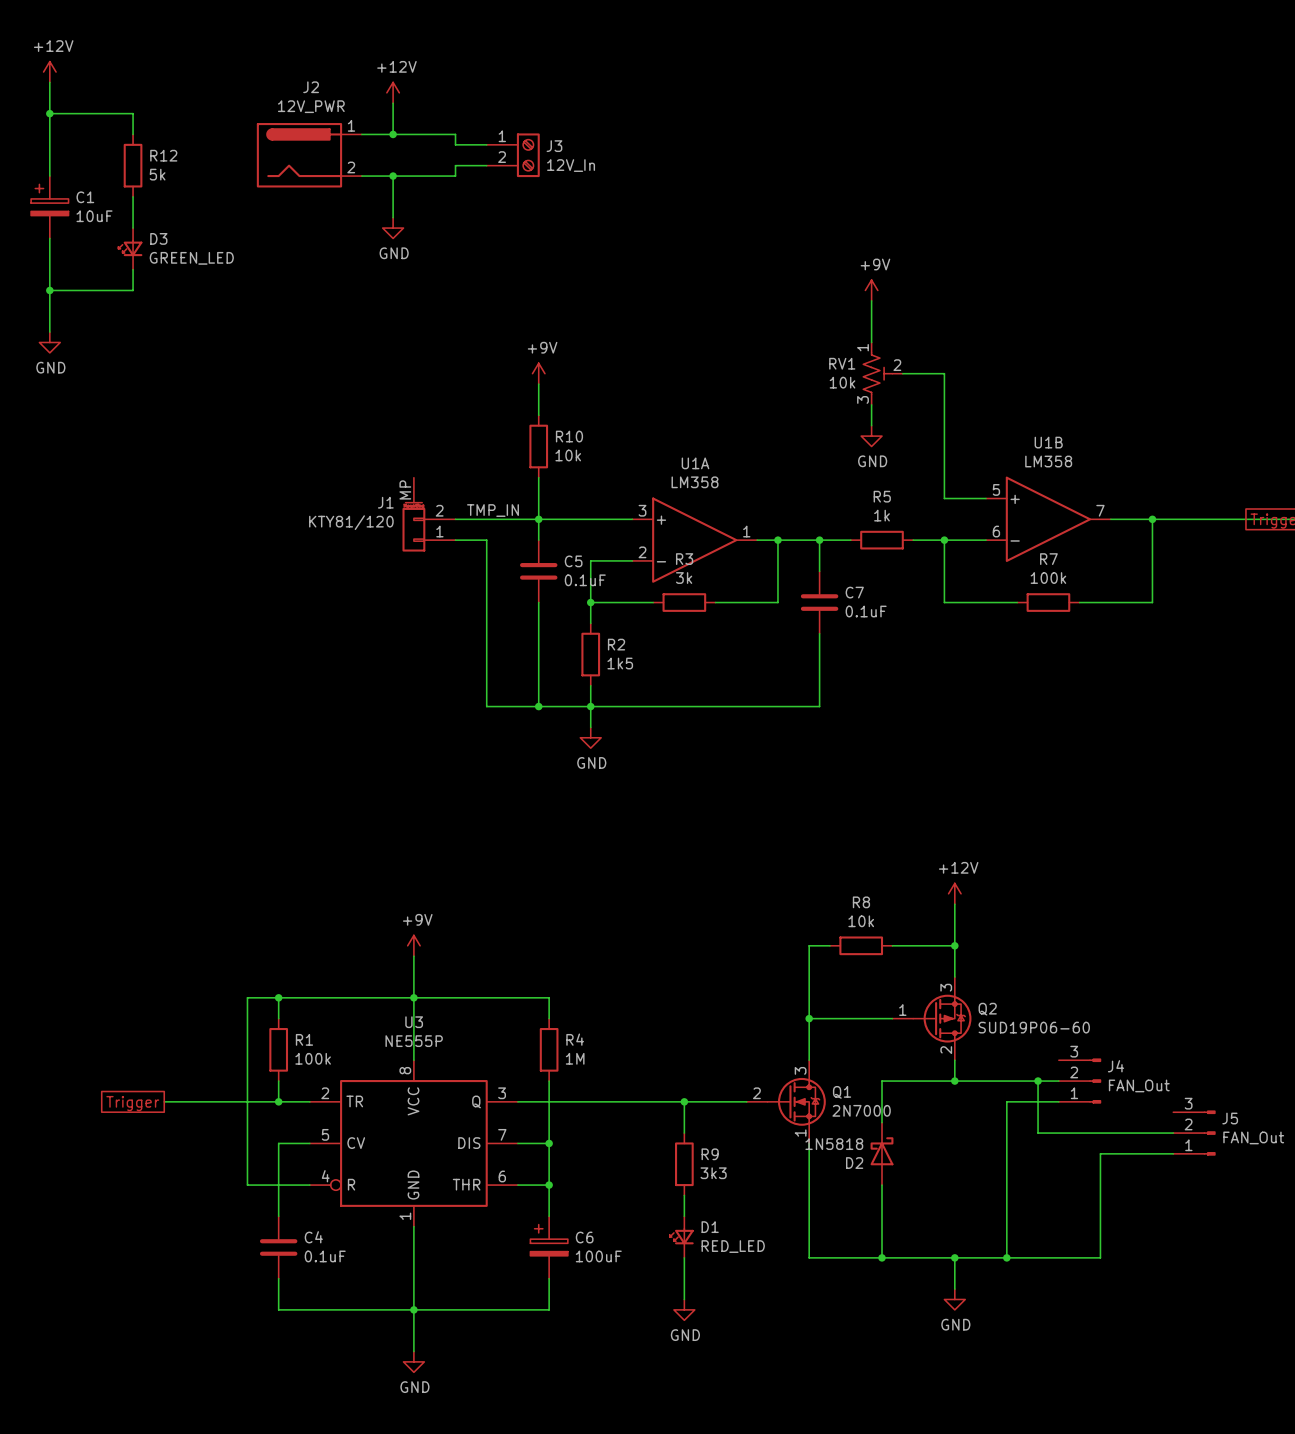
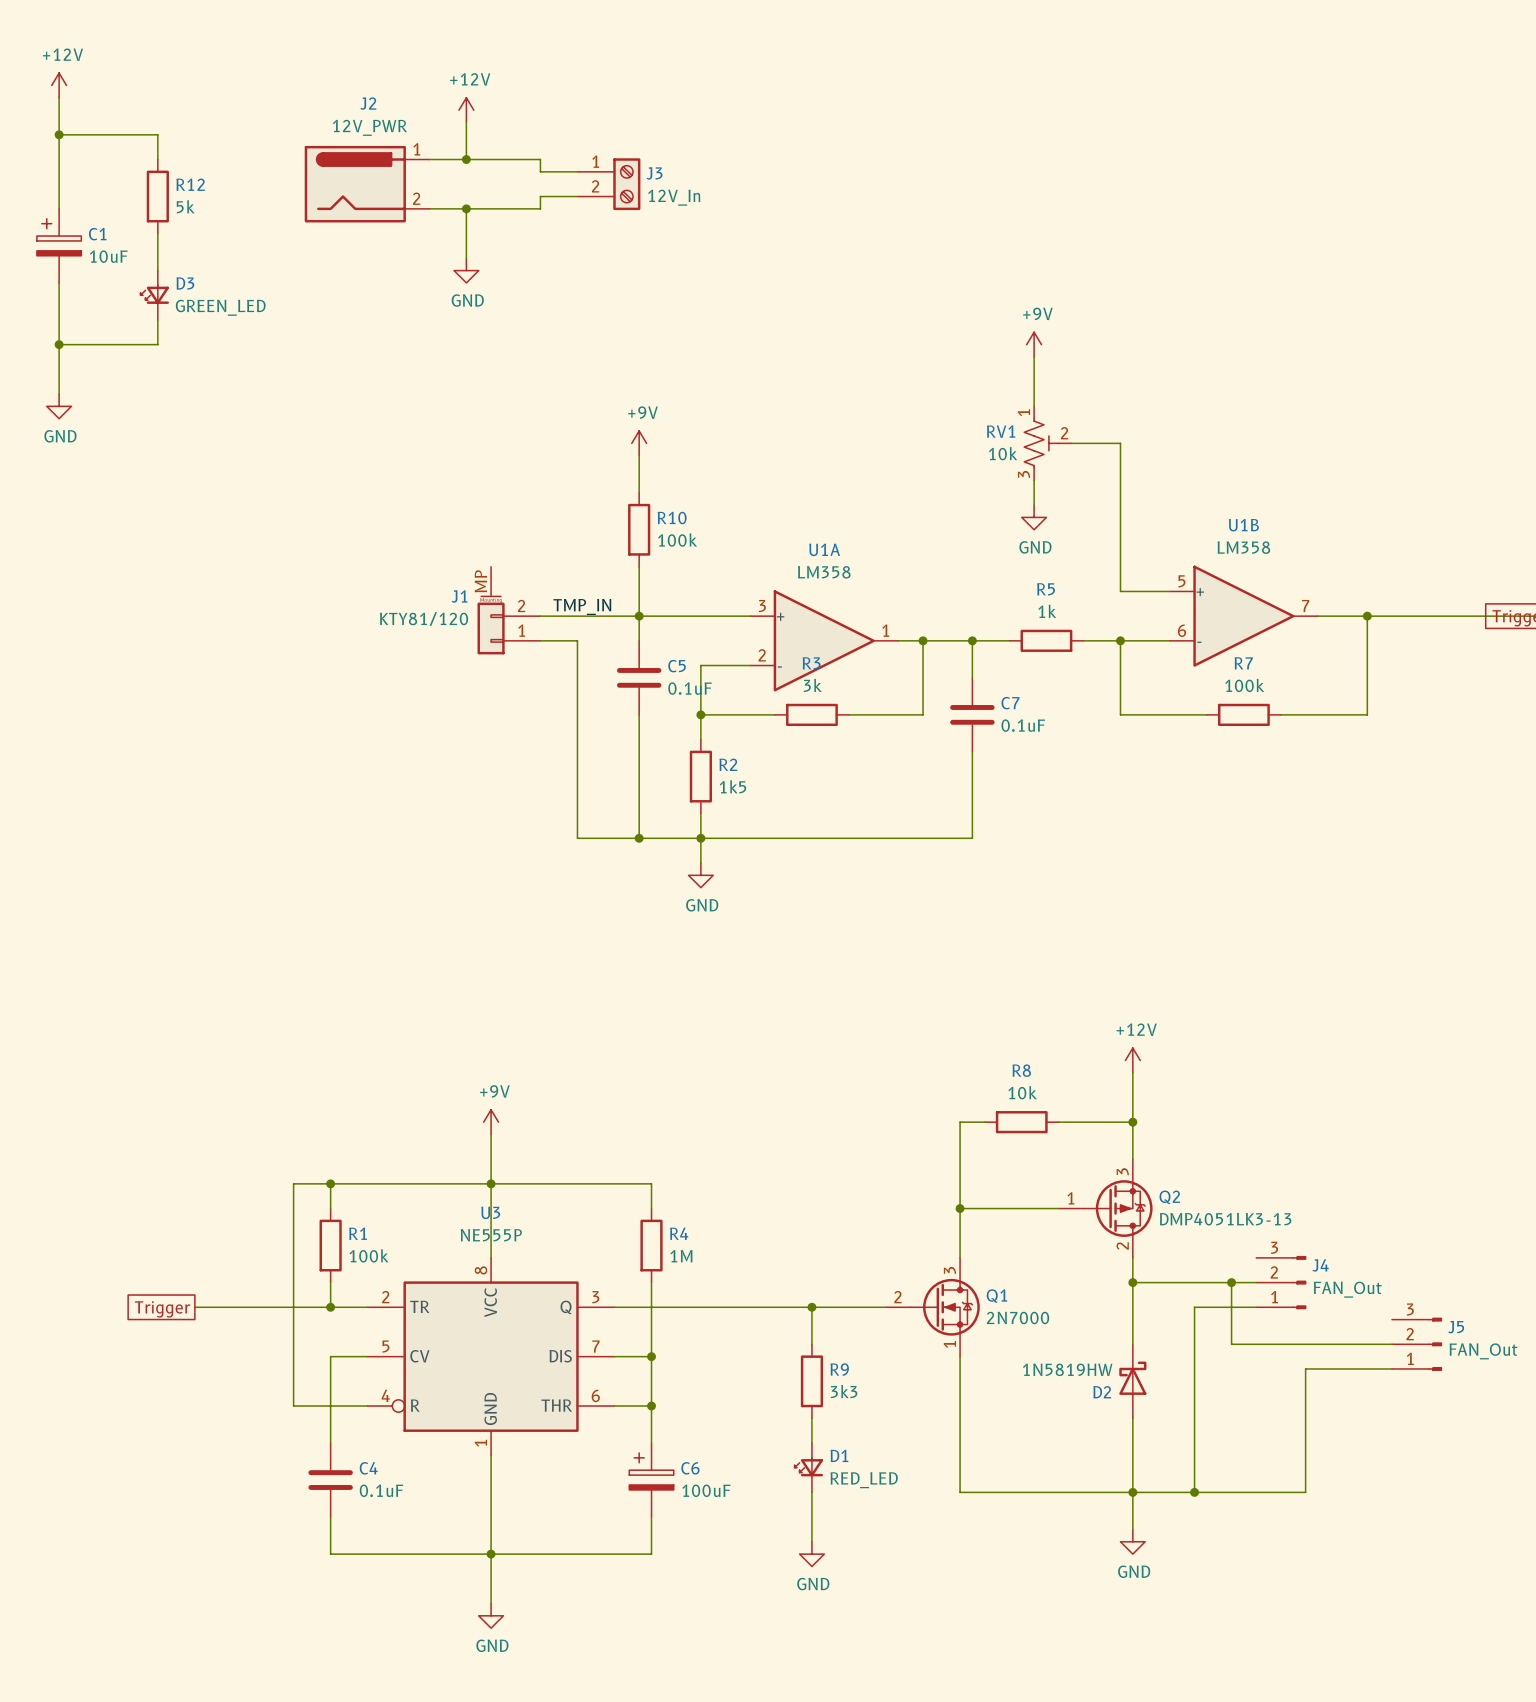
R10 value: 10k (568, 455) -> 100k (677, 540)
Q2 value: SUD19P06-60 (1034, 1027) -> DMP4051LK3-13 (1225, 1219)
wire: (954, 1081) (882, 1081) (882, 1122) -> (1132, 1282) (1132, 1344)
D2 value: 1N5818 (834, 1144) -> 1N5819HW (1067, 1369)
D2 position: (882, 1153) -> (1132, 1381)
wire: (882, 1185) (882, 1257) -> none
wire: none -> (1132, 1418) (1132, 1492)
junction: (882, 1257) -> none

